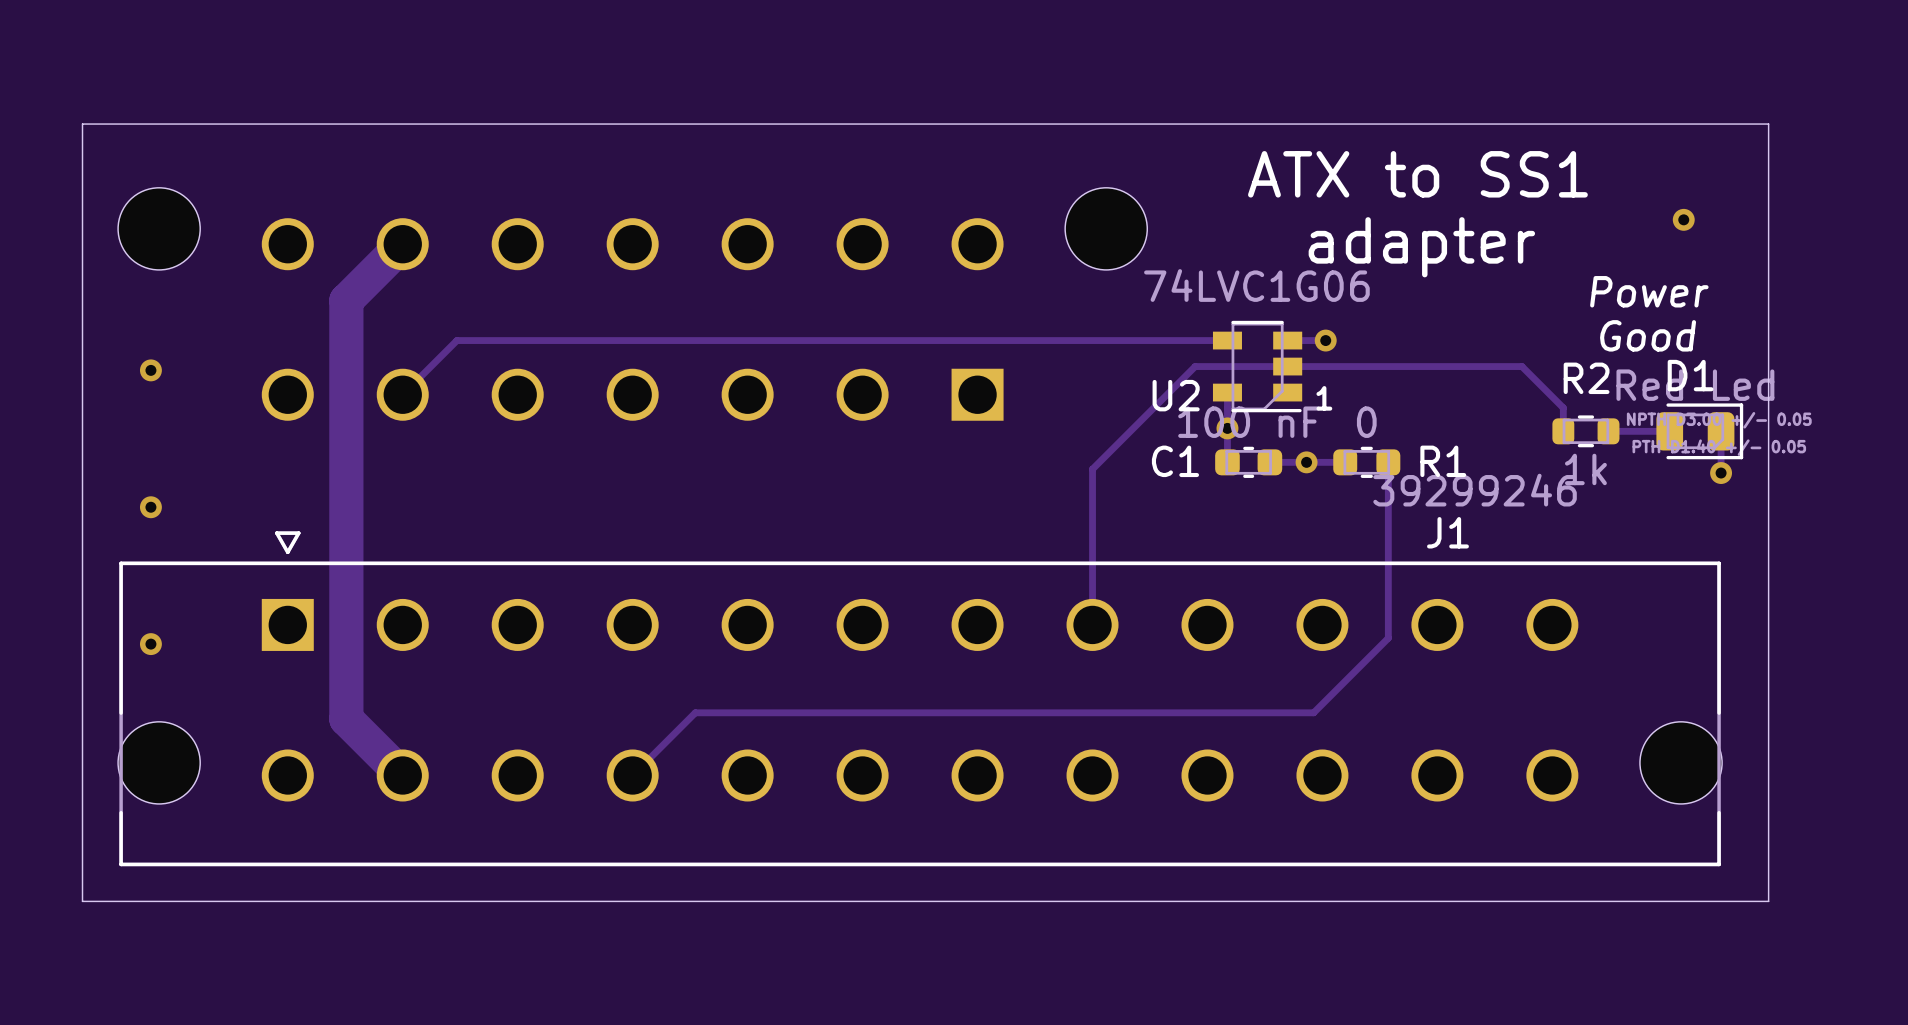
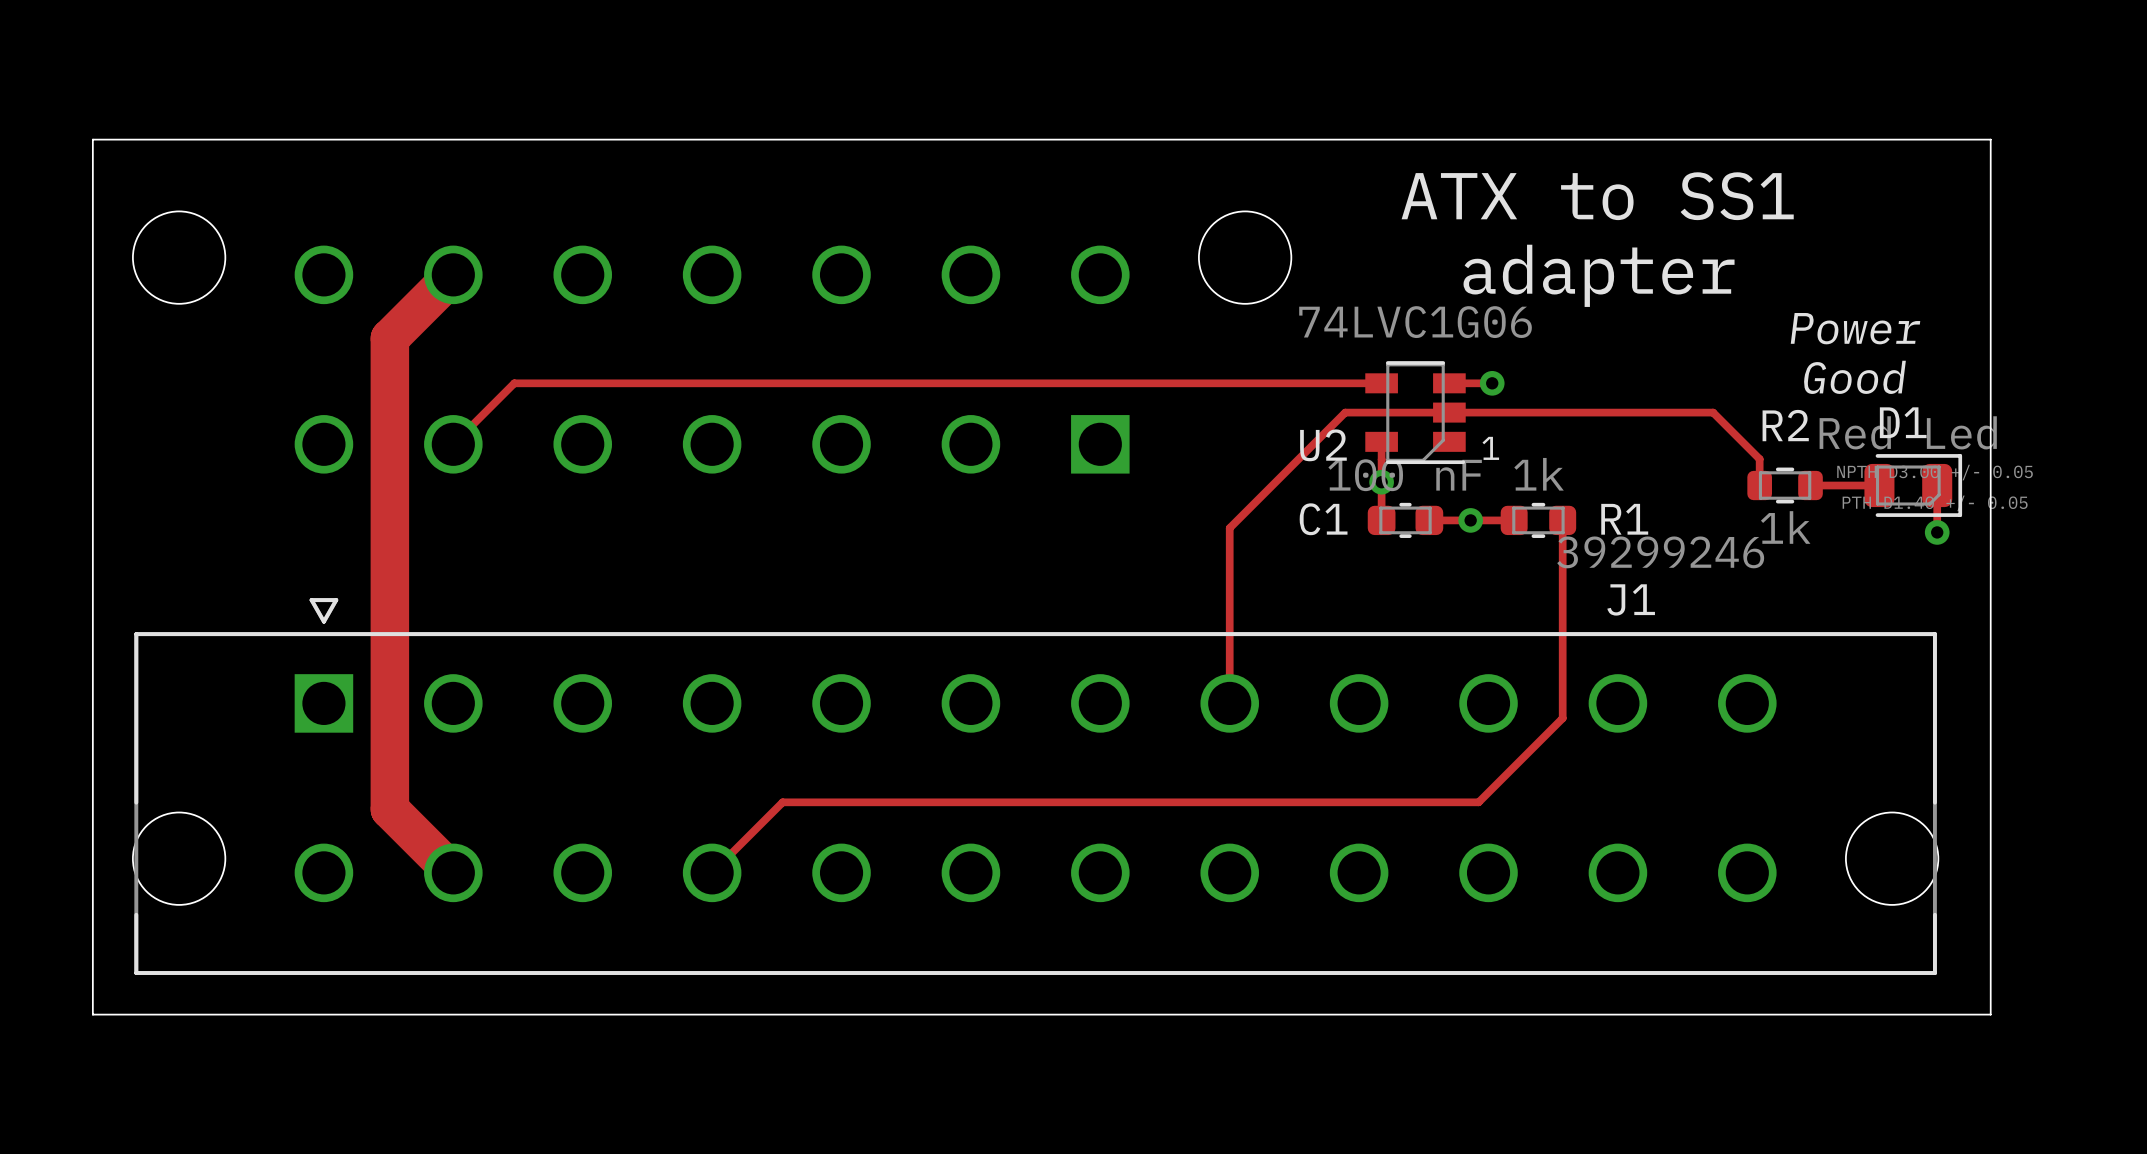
via: (1683, 219) -> none
via: (150, 370) -> none
R1 value: 0 (1366, 422) -> 1k (1539, 474)
via: (150, 507) -> none
via: (150, 644) -> none

